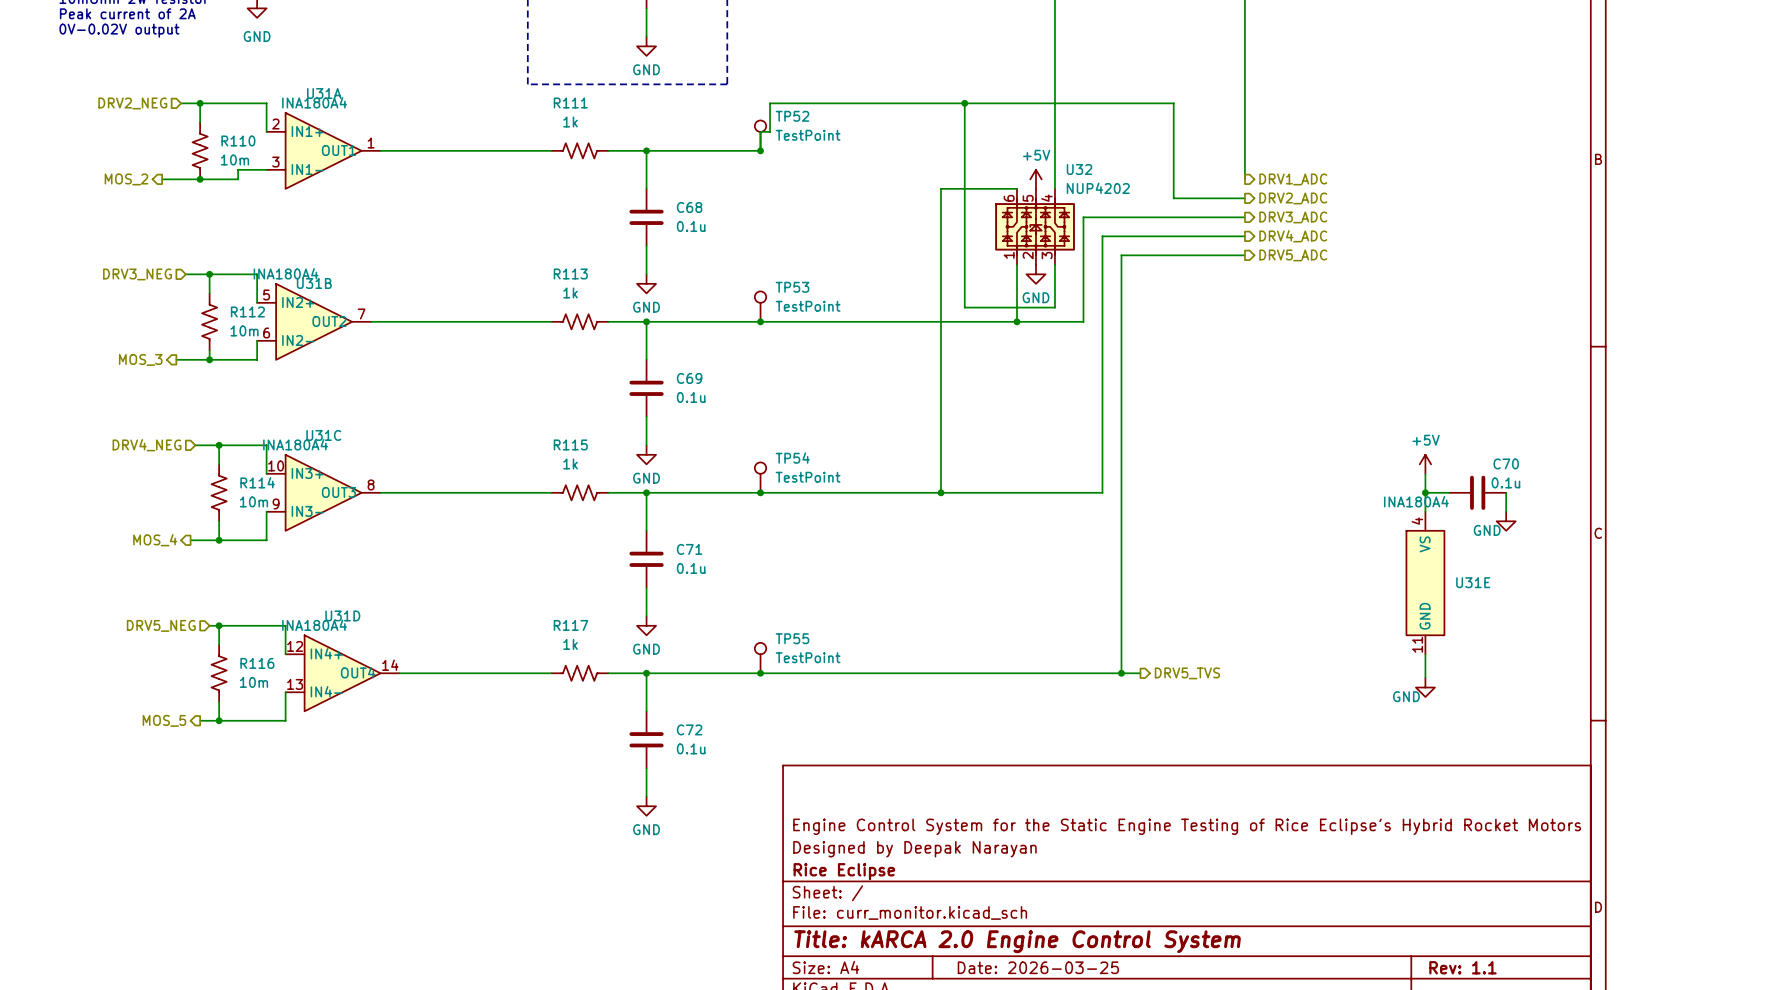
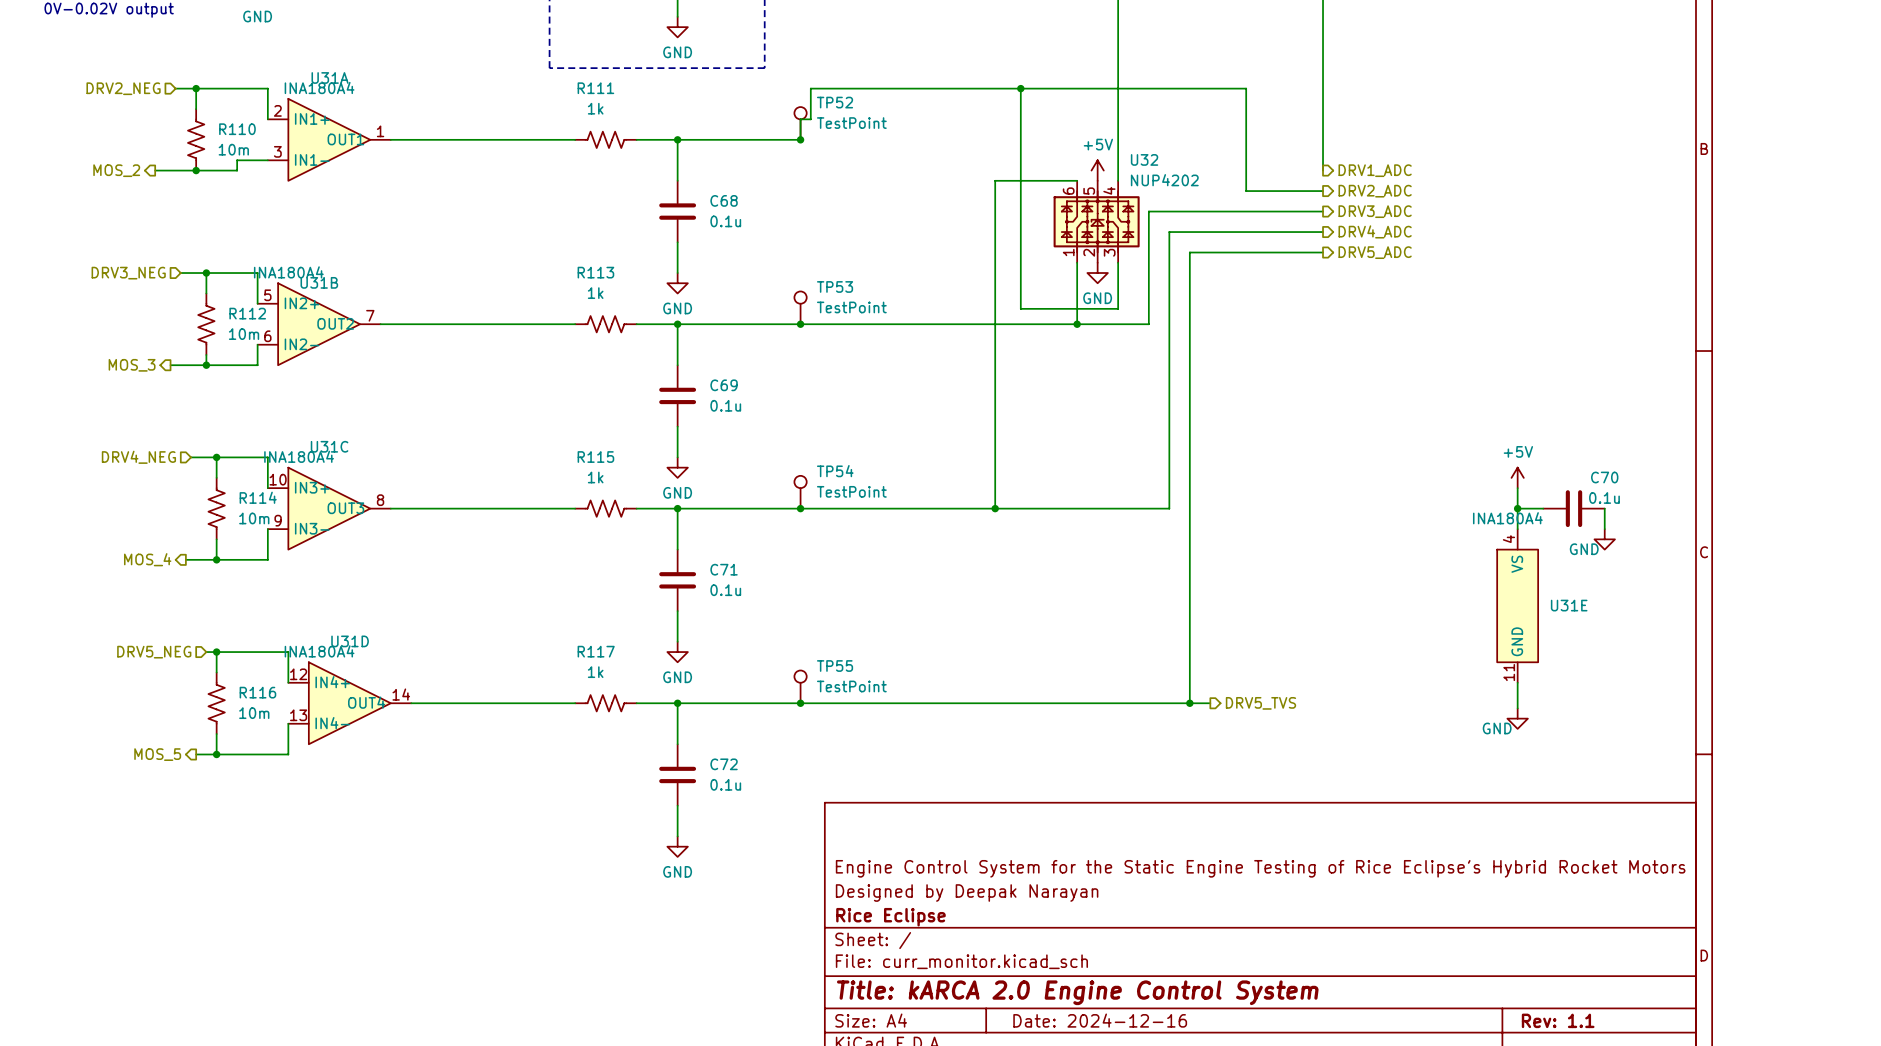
title block: Date: 2026-03-25 (1038, 967) -> Date: 2024-12-16 (1100, 1020)

